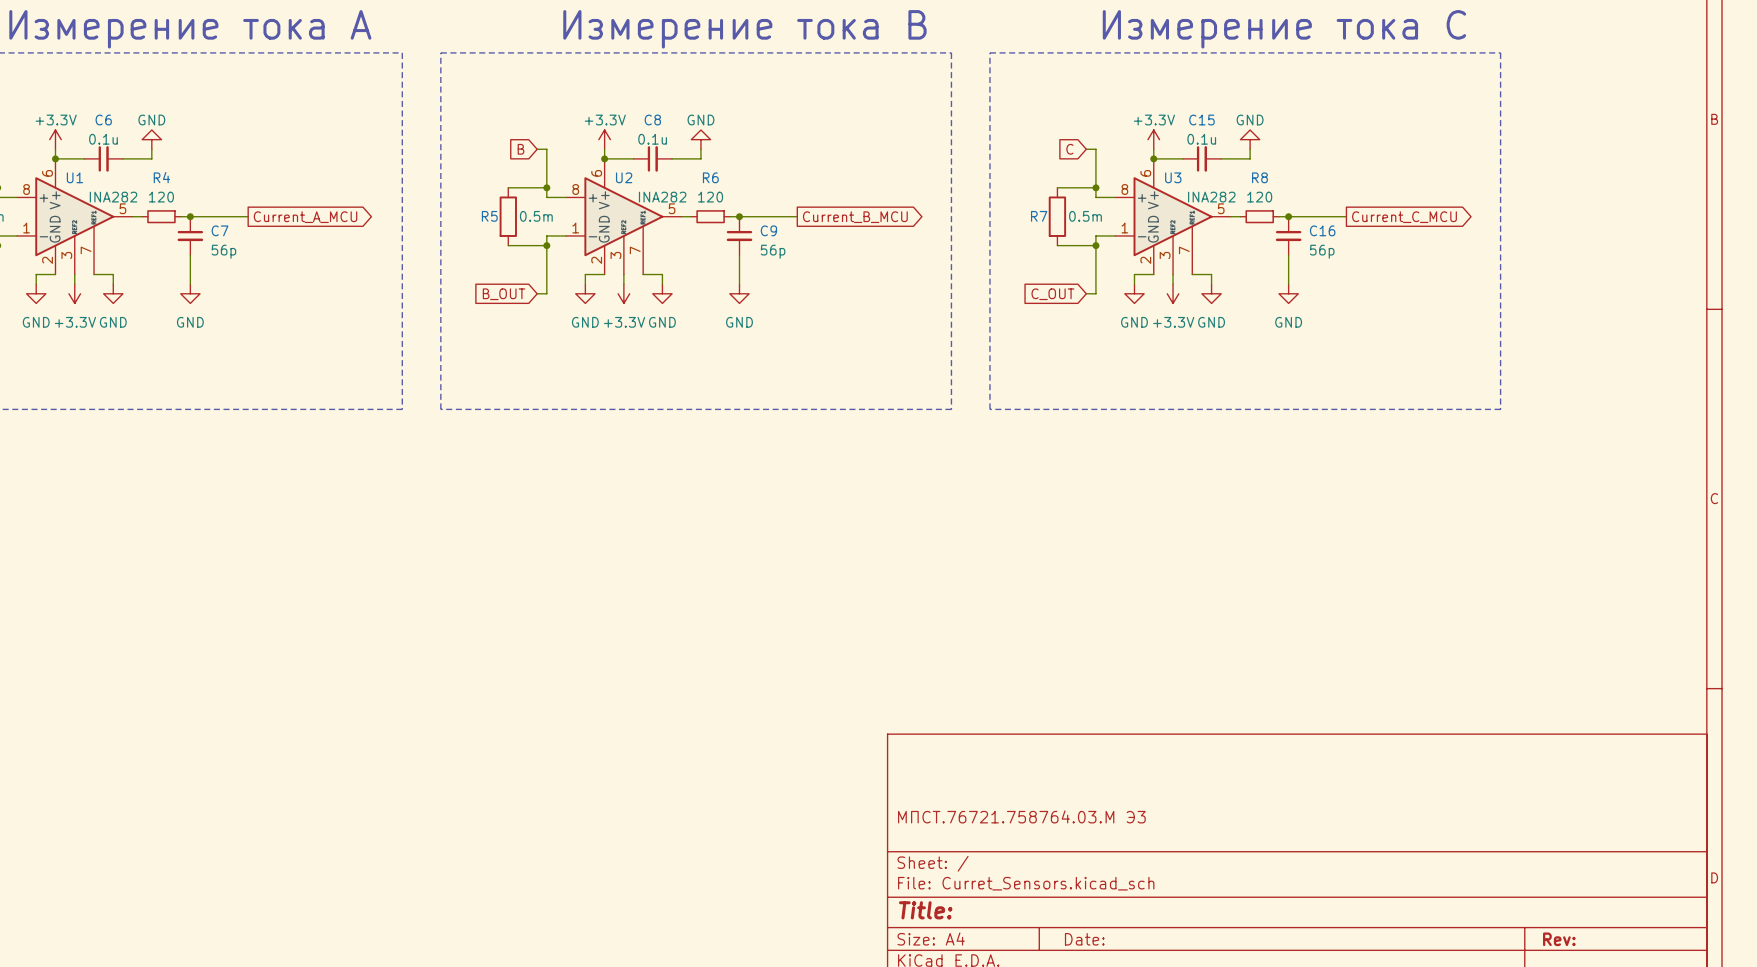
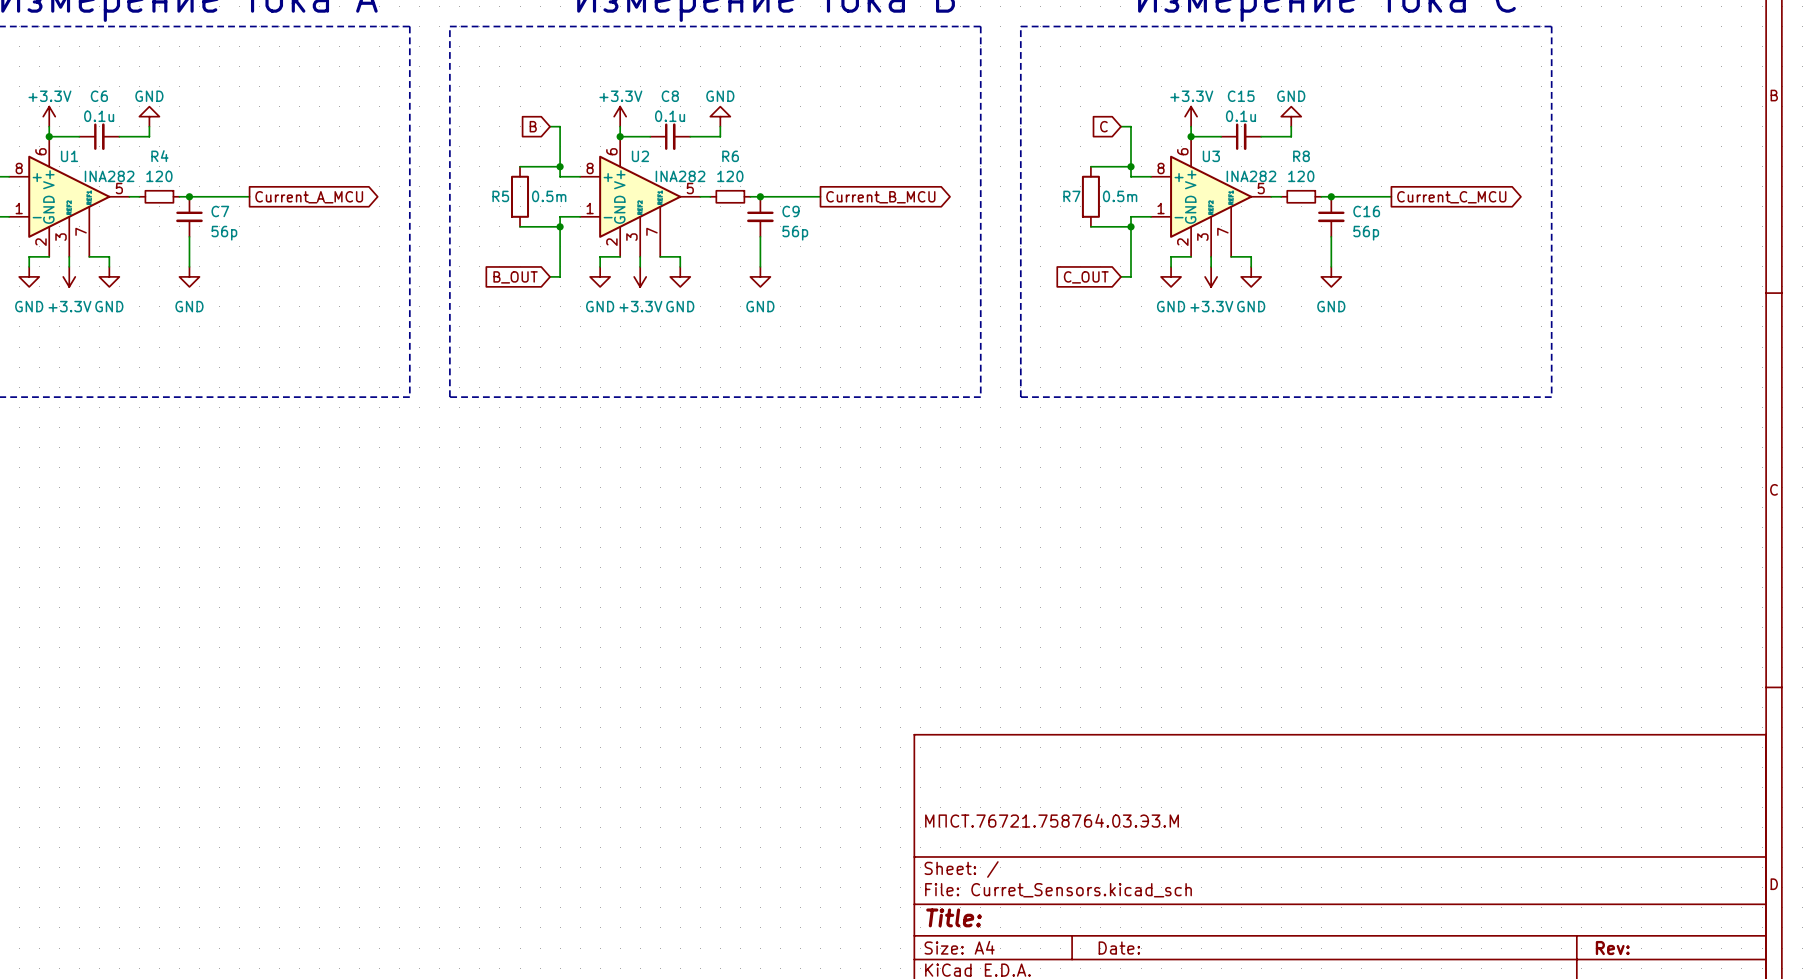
title block: МПСТ.76721.758764.03.М Э3 (1021, 816) -> МПСТ.76721.758764.03.Э3.М (1052, 820)

